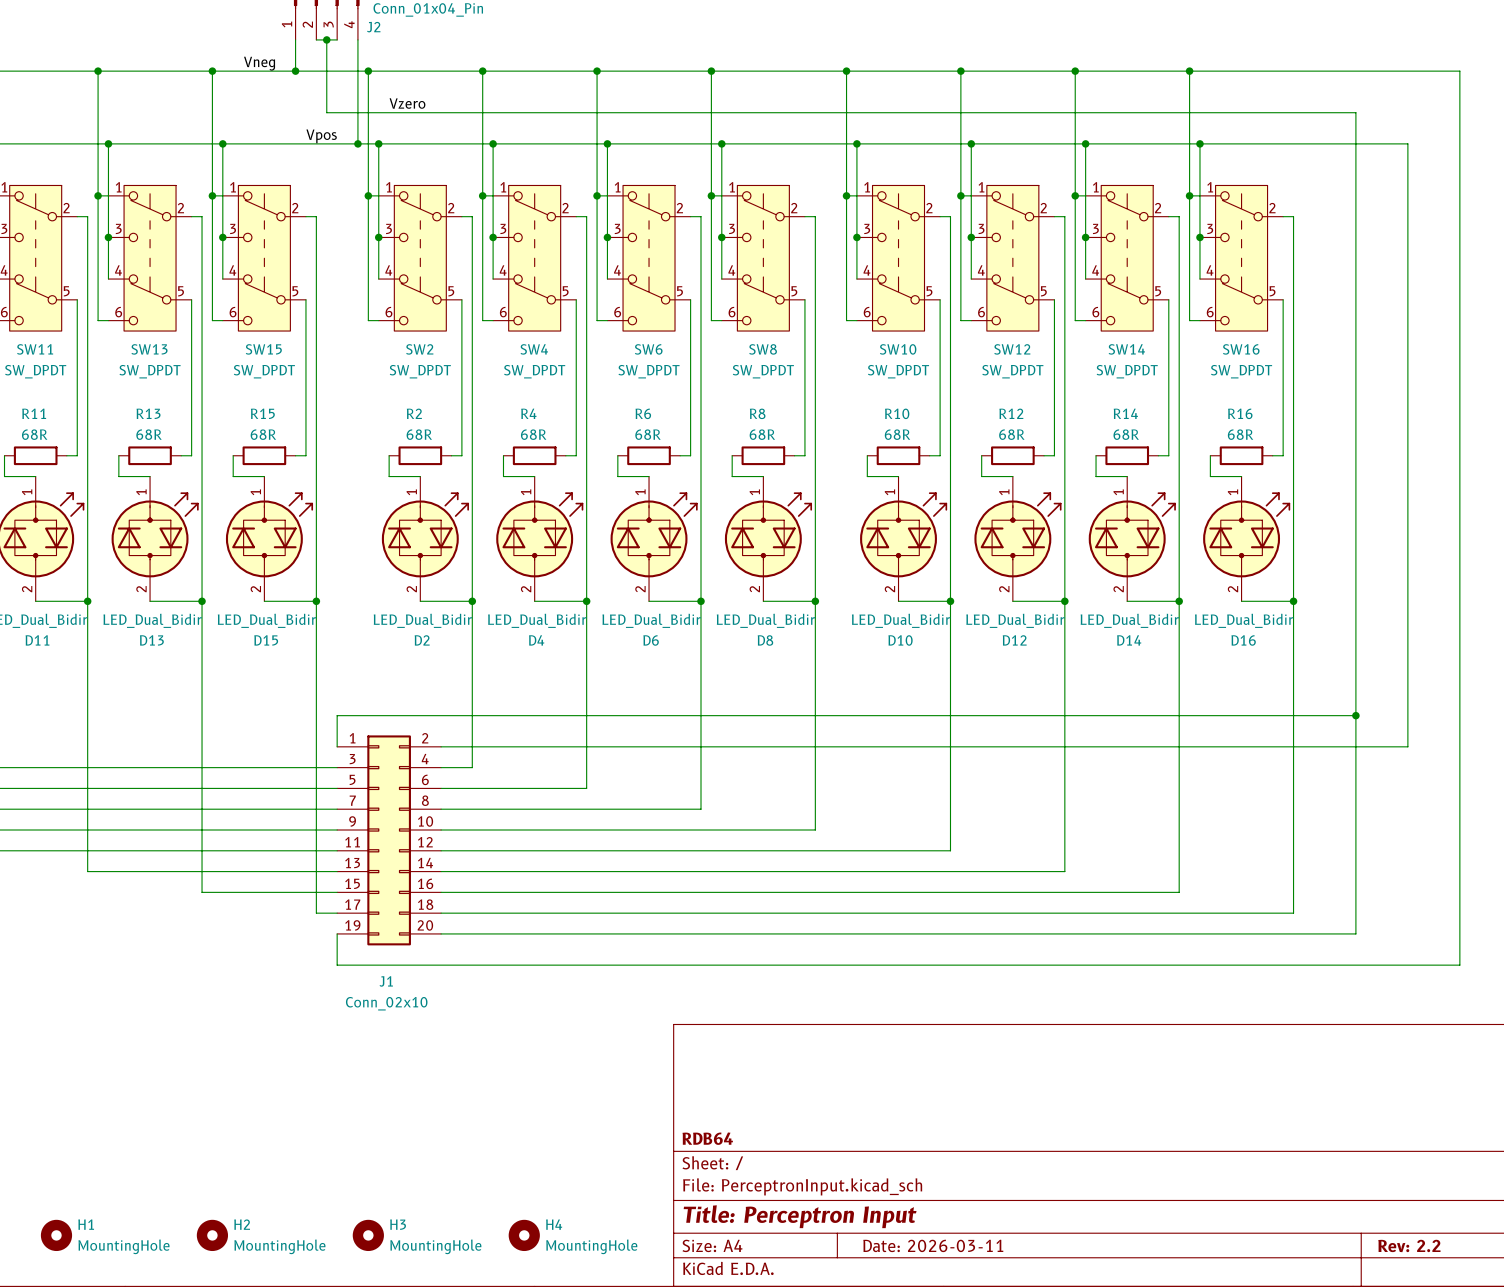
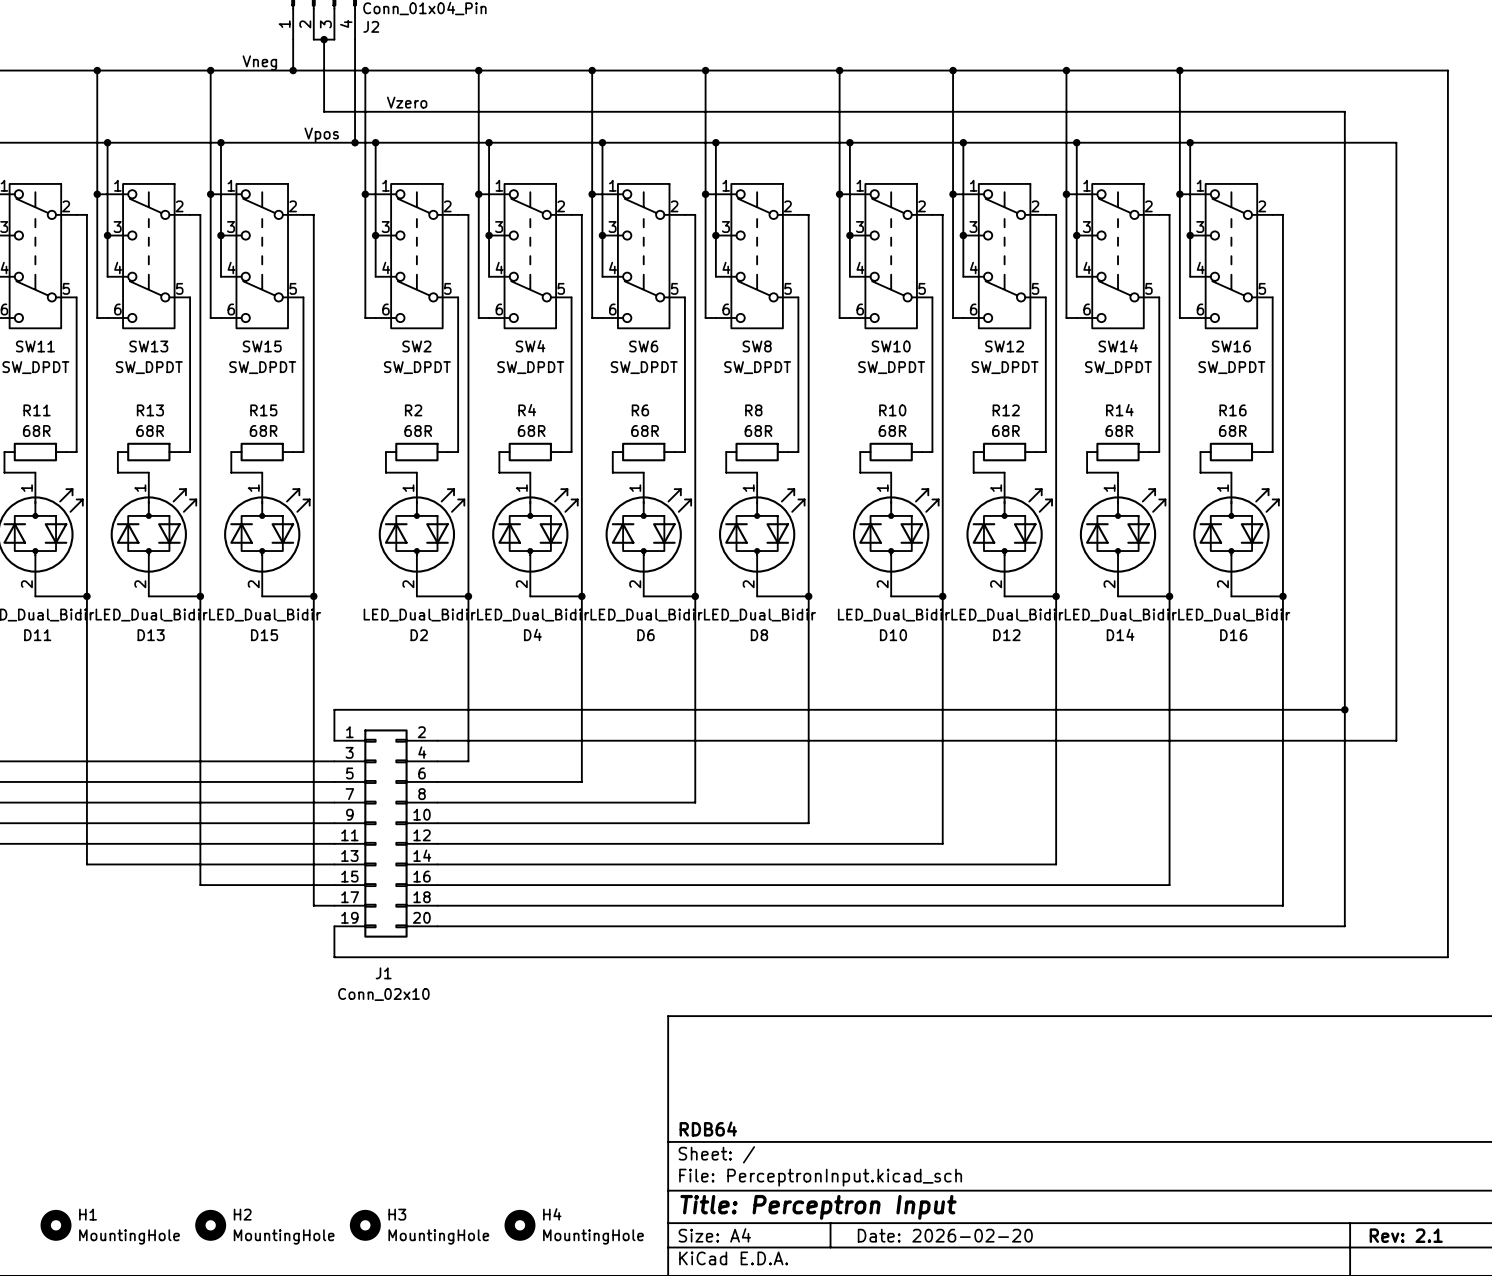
title block: Date: 2026-03-11 (933, 1245) -> Date: 2026-02-20 (945, 1235)
title block: Rev: 2.2 (1409, 1245) -> Rev: 2.1 (1406, 1235)

